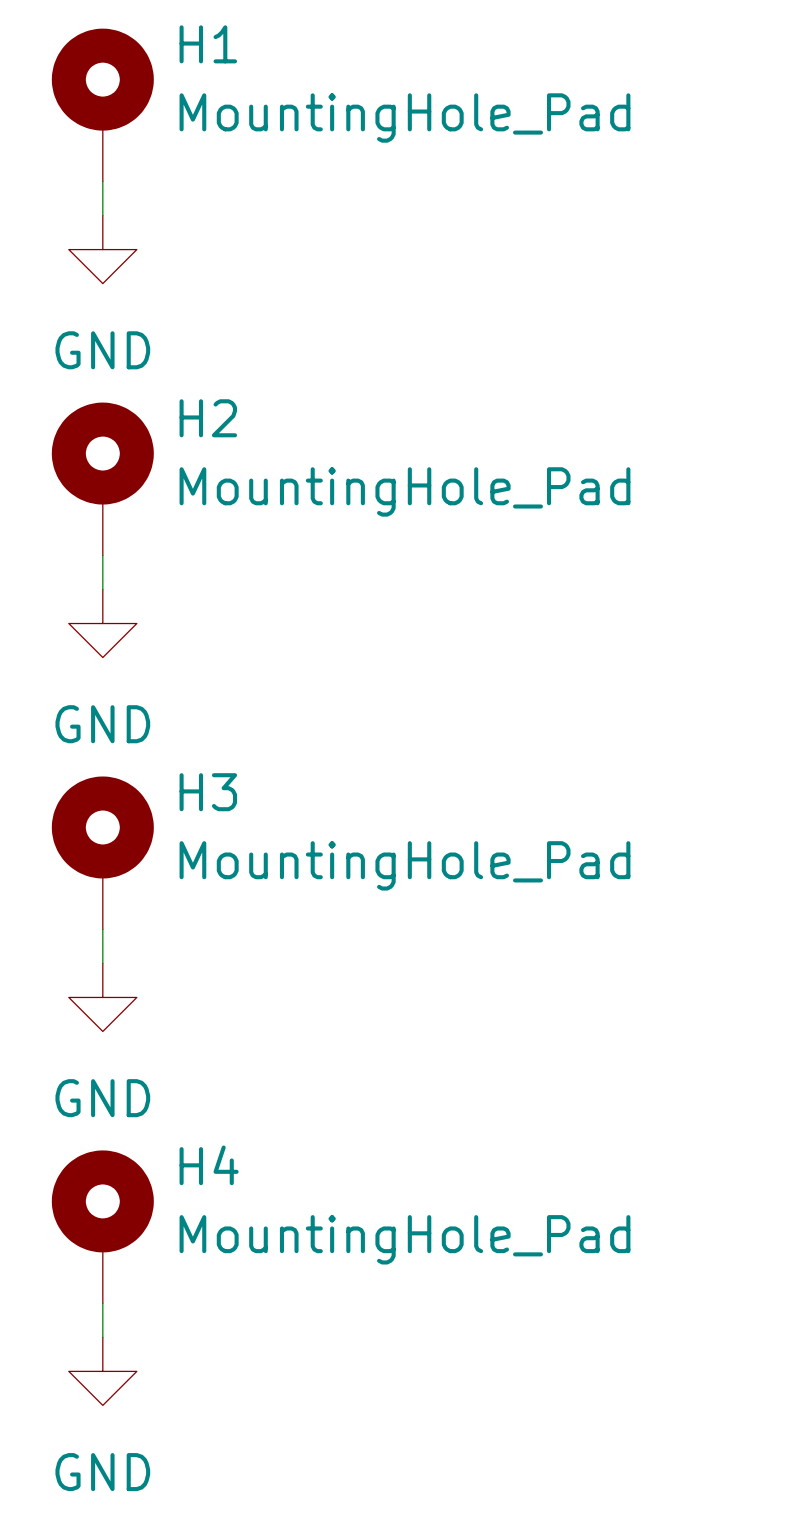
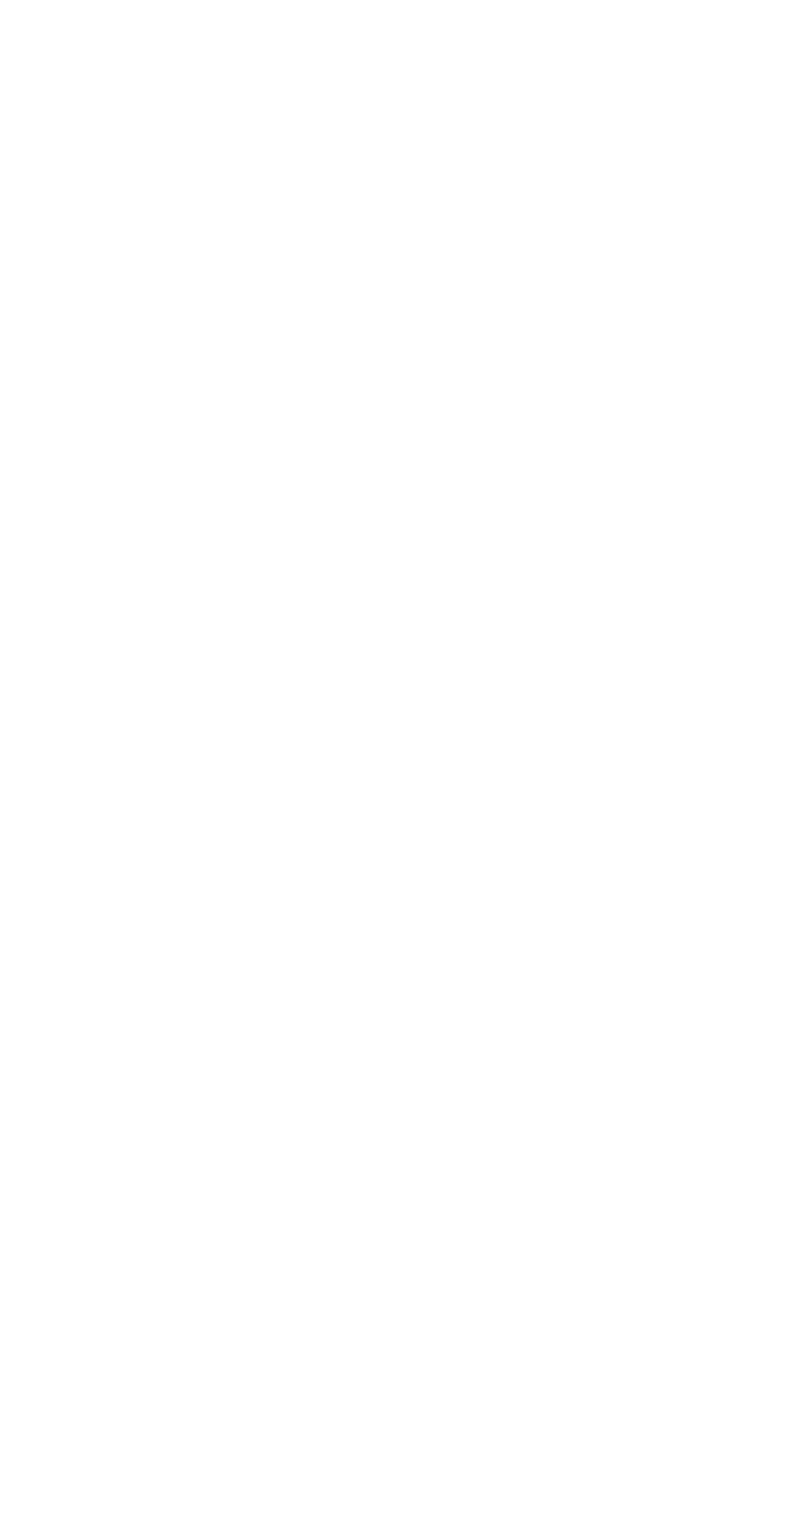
H1: MountingHole_Pad (102, 105) -> none
wire: (102, 181) (102, 215) -> none
power symbol: GND (102, 249) -> none
H2: MountingHole_Pad (102, 479) -> none
wire: (102, 555) (102, 589) -> none
power symbol: GND (102, 623) -> none
H3: MountingHole_Pad (102, 852) -> none
wire: (102, 929) (102, 963) -> none
power symbol: GND (102, 997) -> none
H4: MountingHole_Pad (102, 1226) -> none
wire: (102, 1303) (102, 1337) -> none
power symbol: GND (102, 1371) -> none

